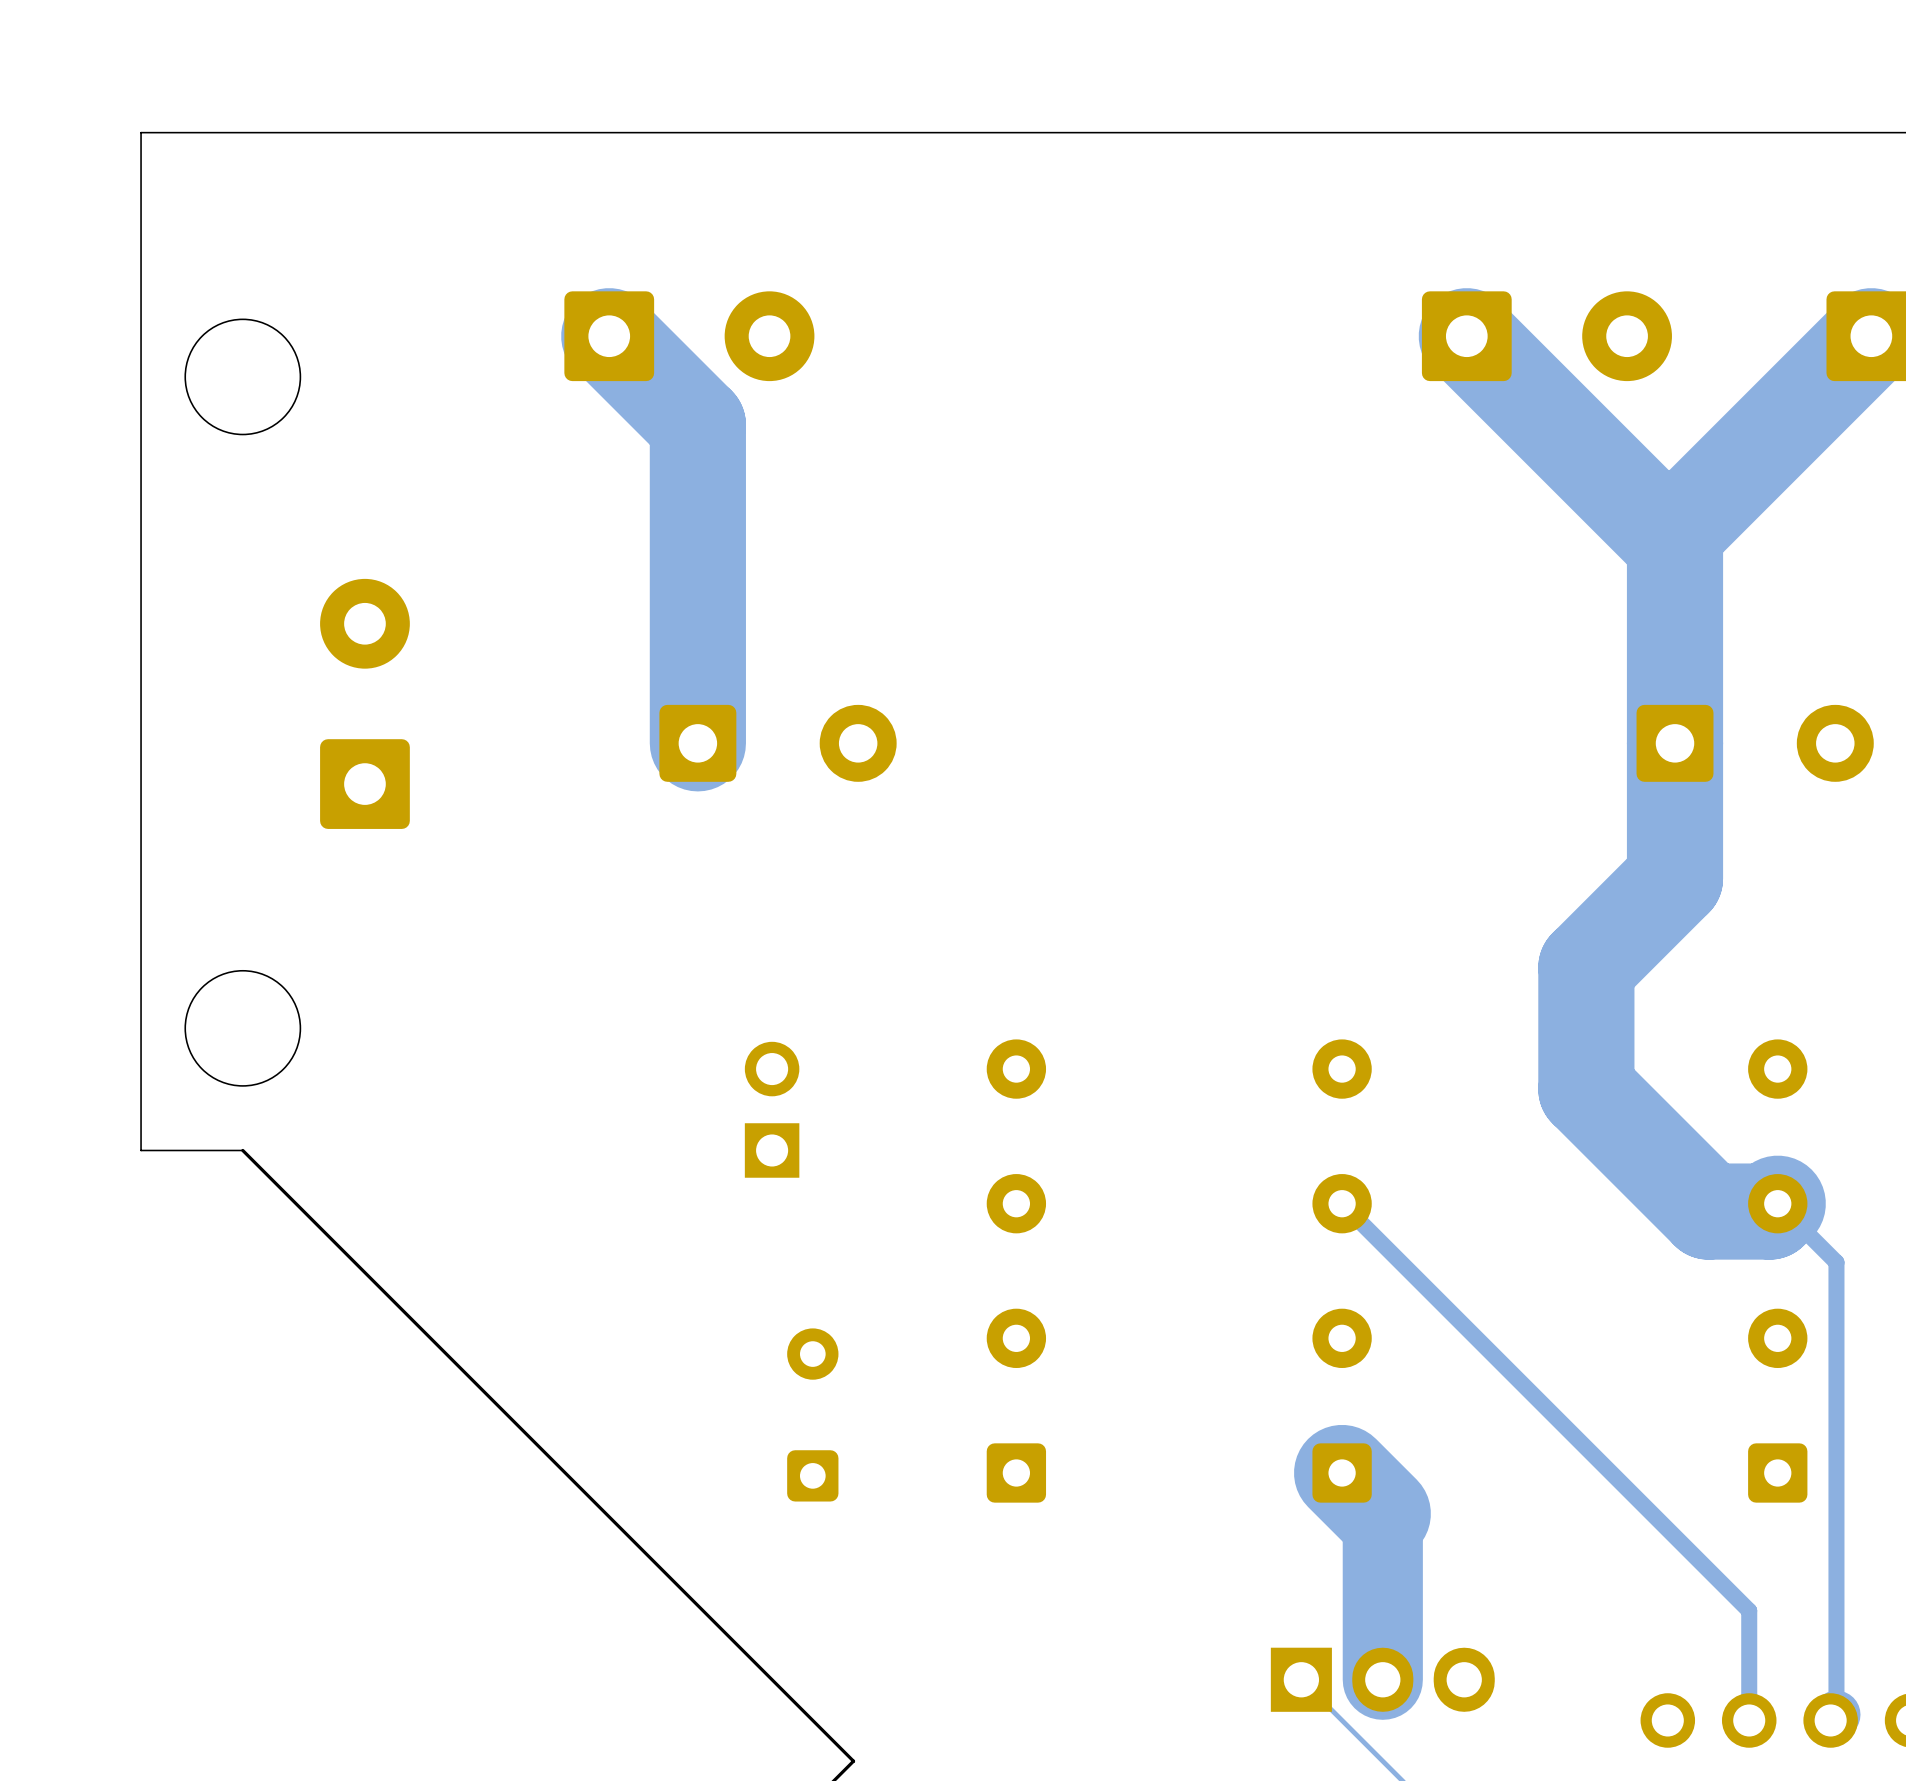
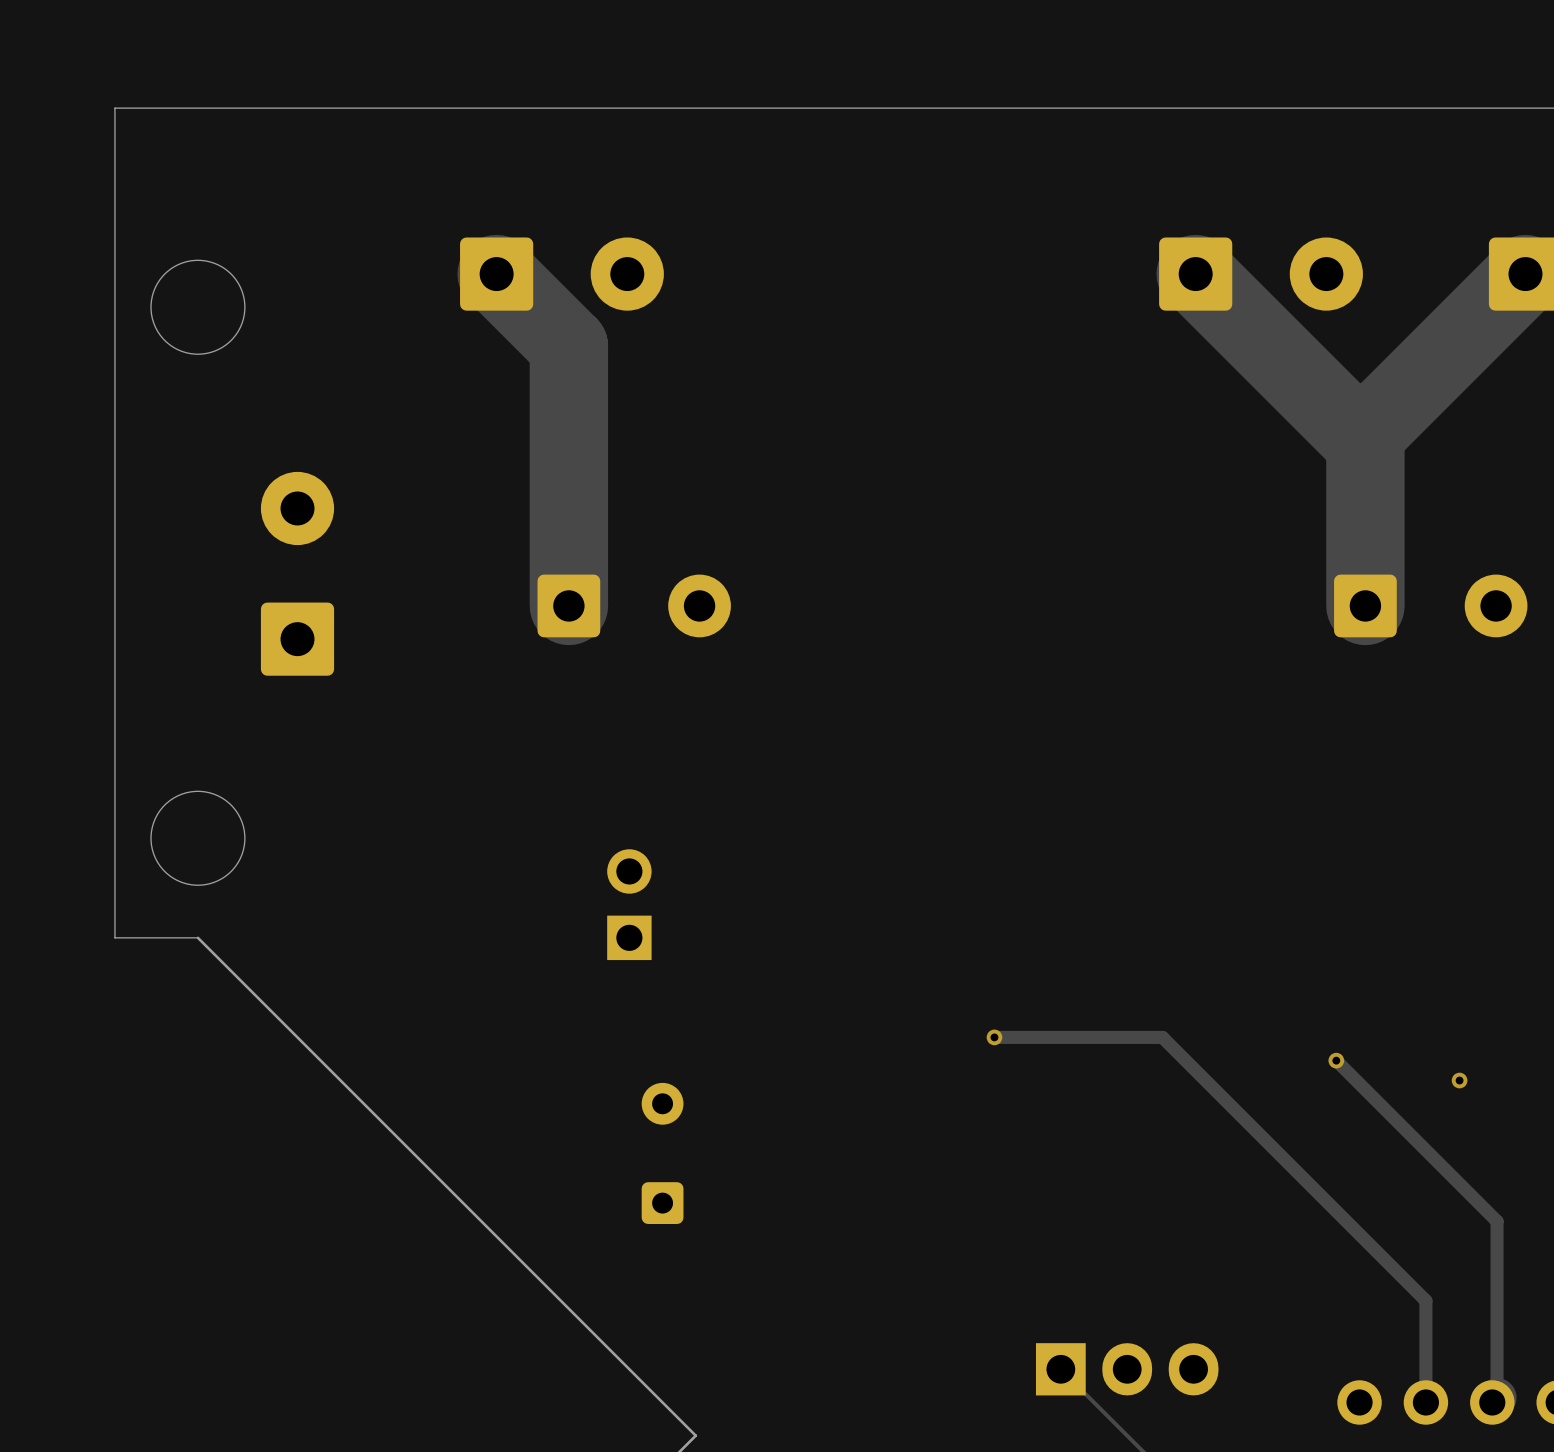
track: (1675, 743) (1675, 878) (1586, 967) (1586, 1089) (1708, 1211) (1769, 1211) (1777, 1203) (1836, 1262) (1836, 1498) -> (1336, 1060) (1497, 1221)
track: (1342, 1203) (1749, 1610) -> (994, 1037) (1162, 1037) (1425, 1300) (1425, 1313)
part: (1016, 1271) -> none
part: (1342, 1271) -> none
part: (1777, 1271) -> none
via: none -> (994, 1037)
via: none -> (1336, 1060)
via: none -> (1459, 1080)
track: (1342, 1472) (1382, 1513) (1382, 1679) -> none

